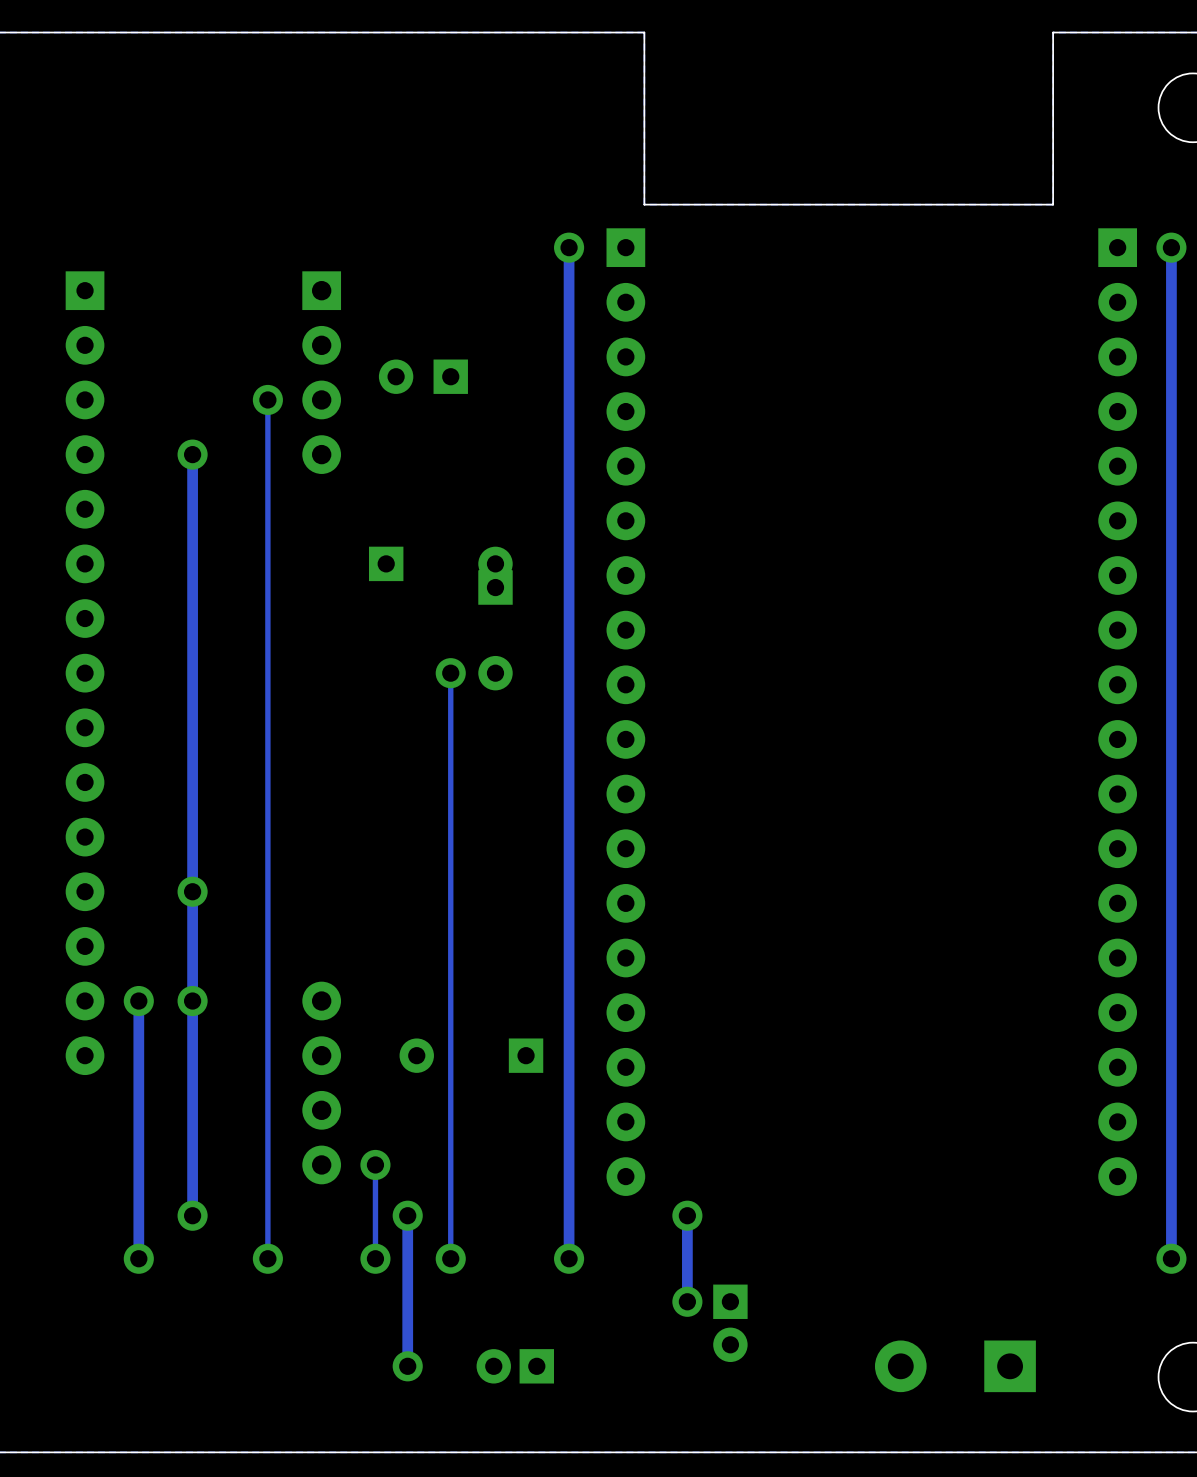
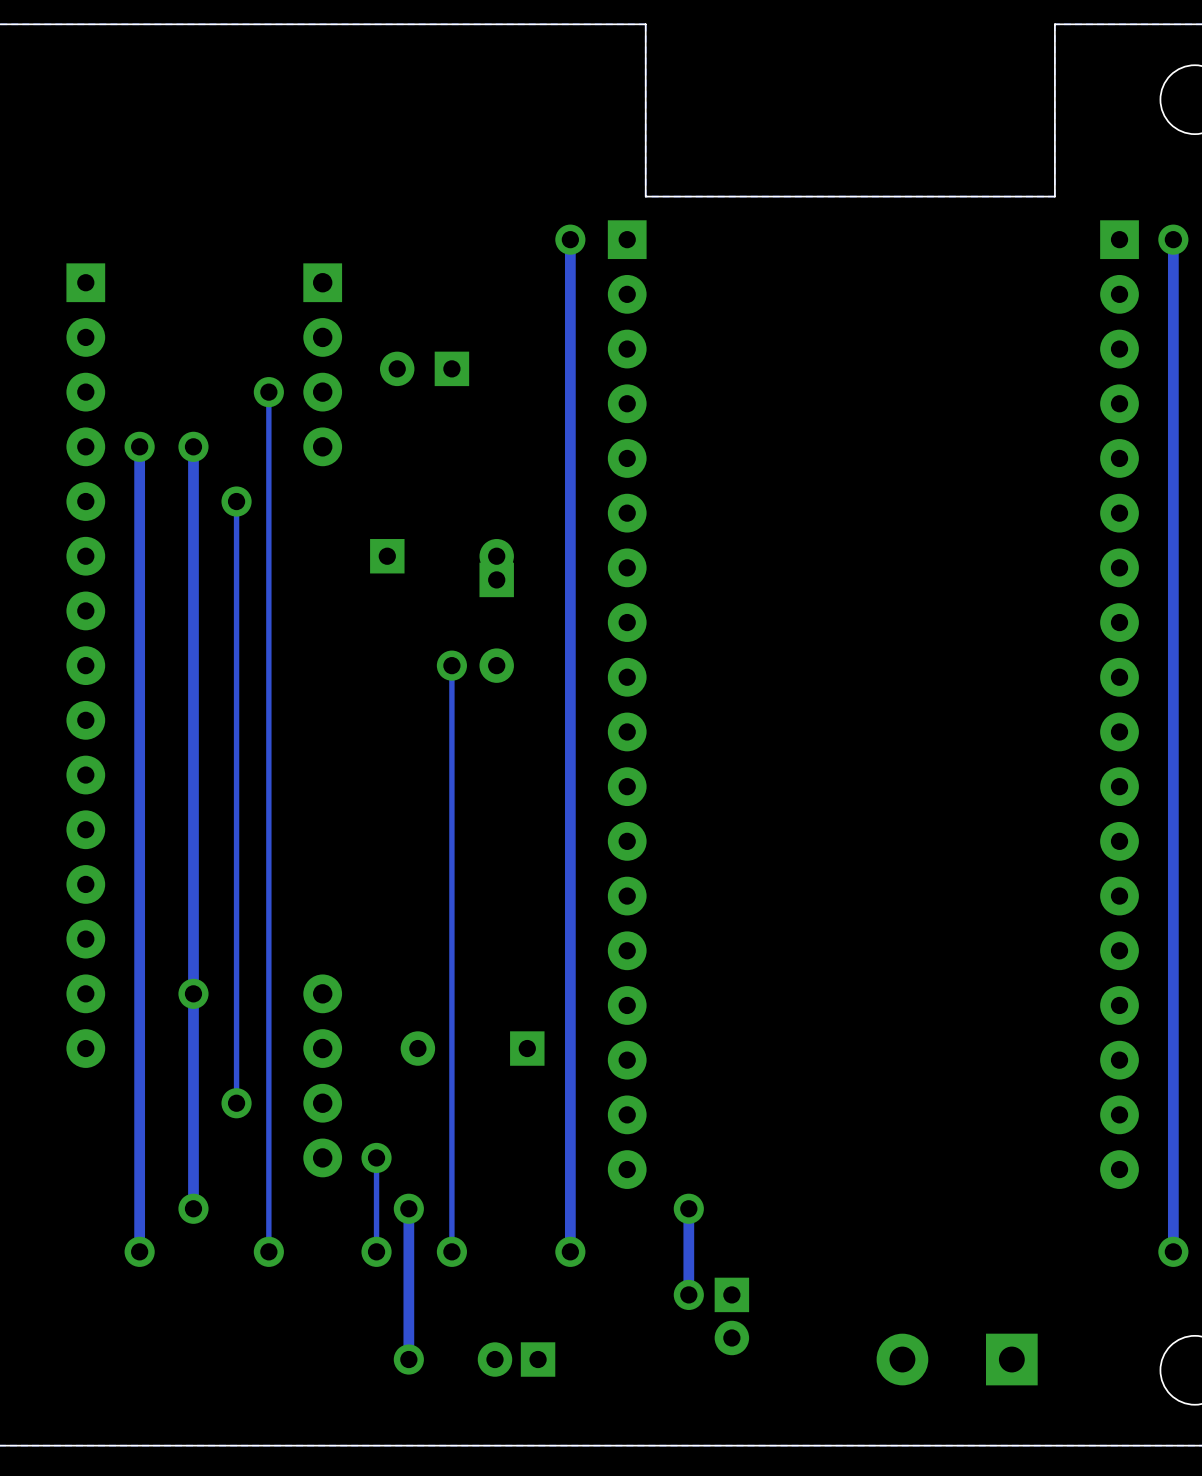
track: none -> (139, 446) (139, 993)
via: none -> (139, 446)
track: none -> (236, 501) (236, 1103)
via: none -> (236, 501)
via: (192, 891) -> none
via: (138, 1001) -> none
via: none -> (236, 1103)

